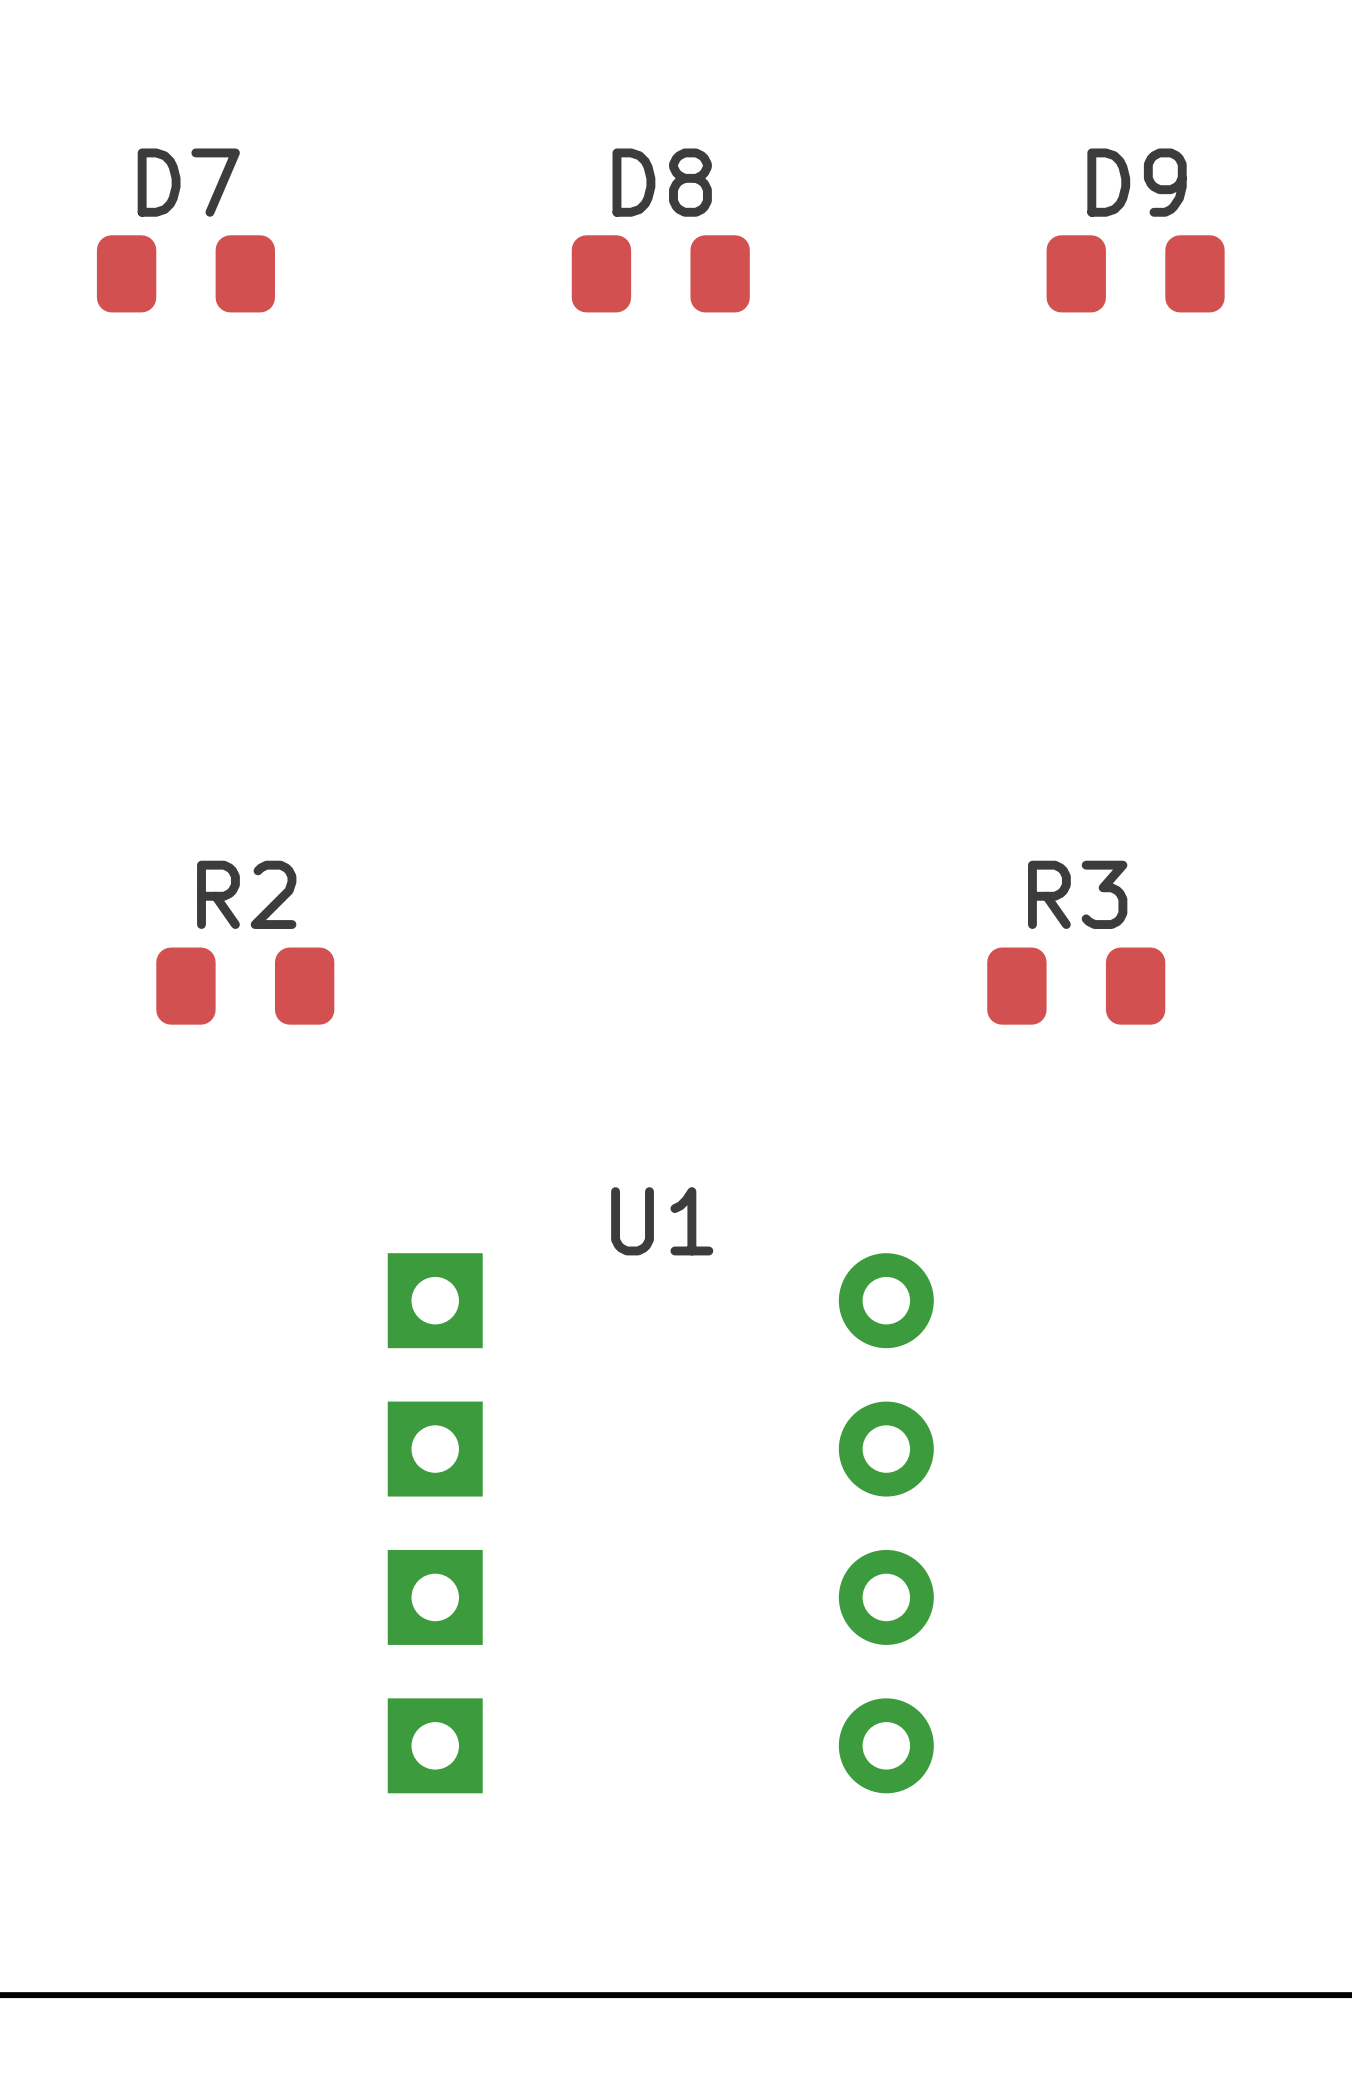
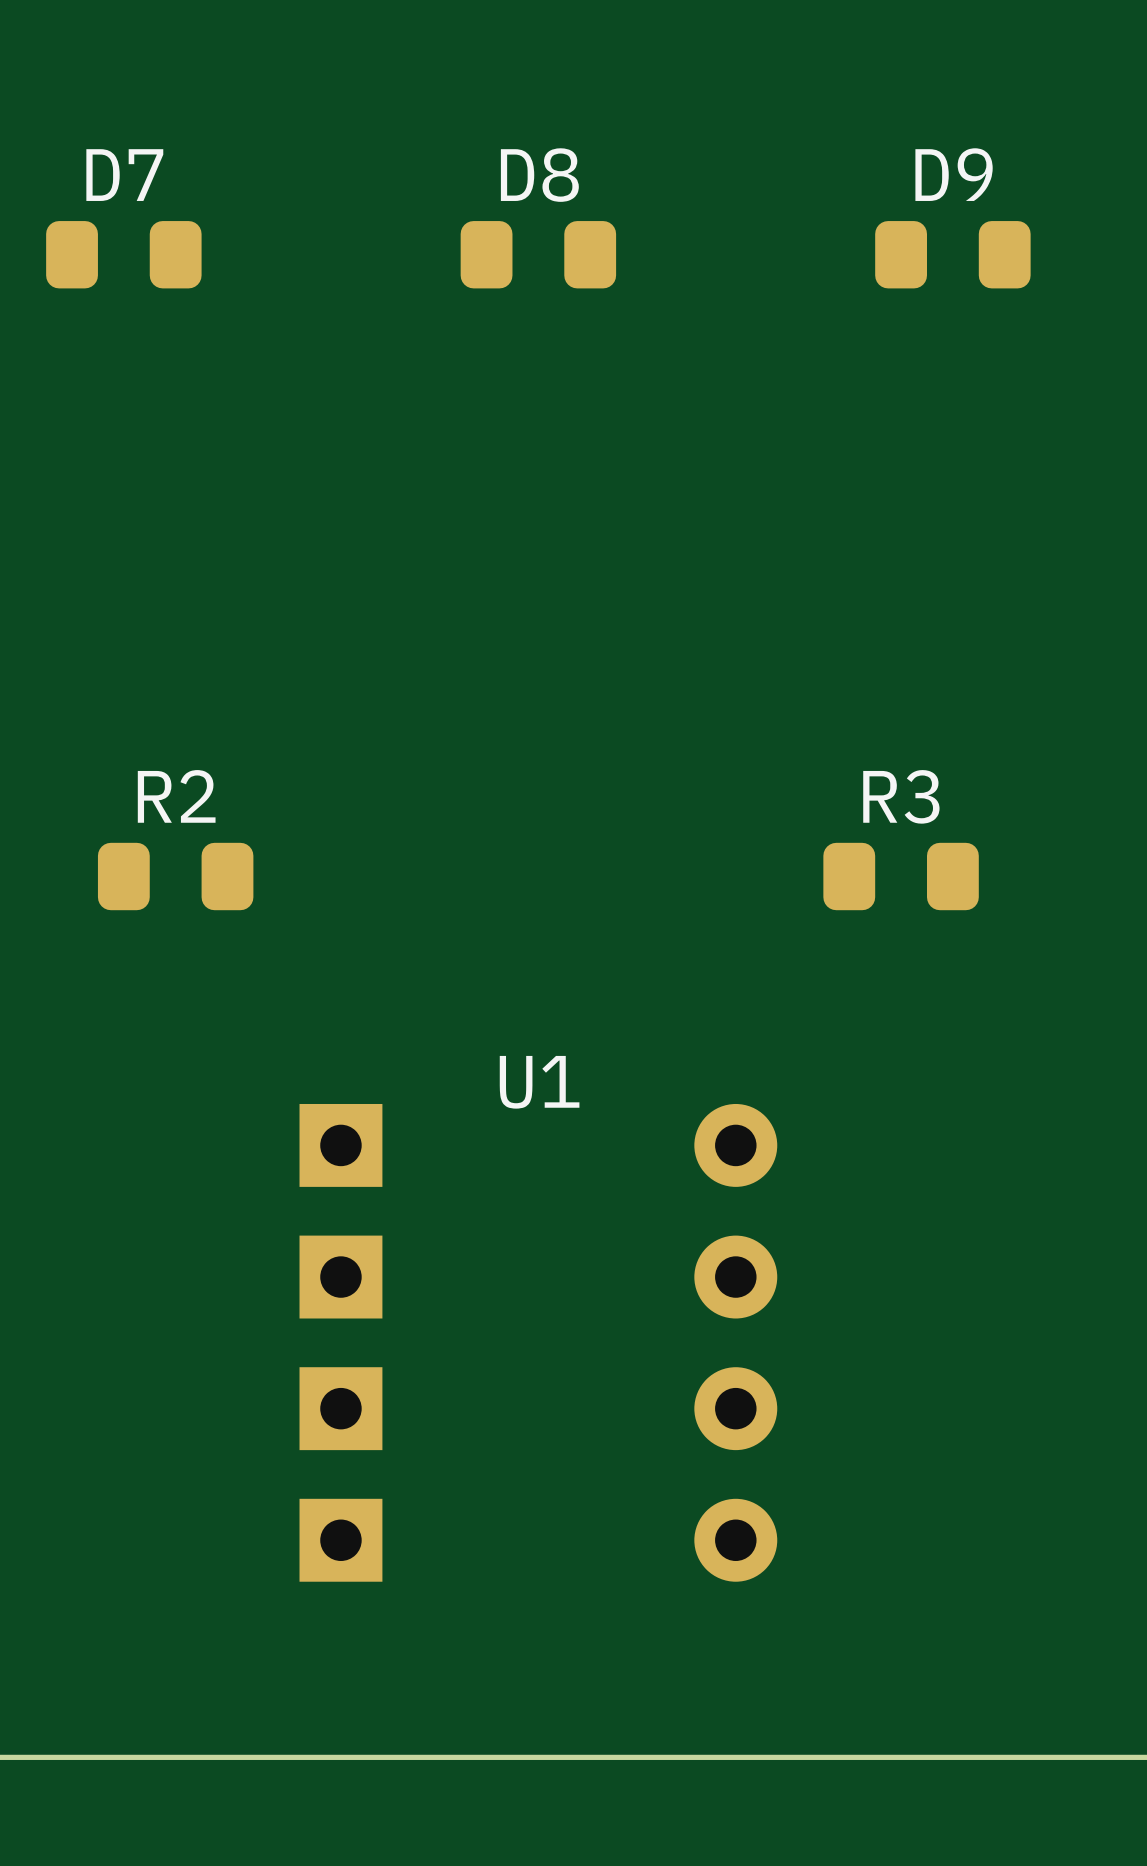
U1 footprint: [387, 1253, 934, 1794] -> [299, 1103, 778, 1582]

